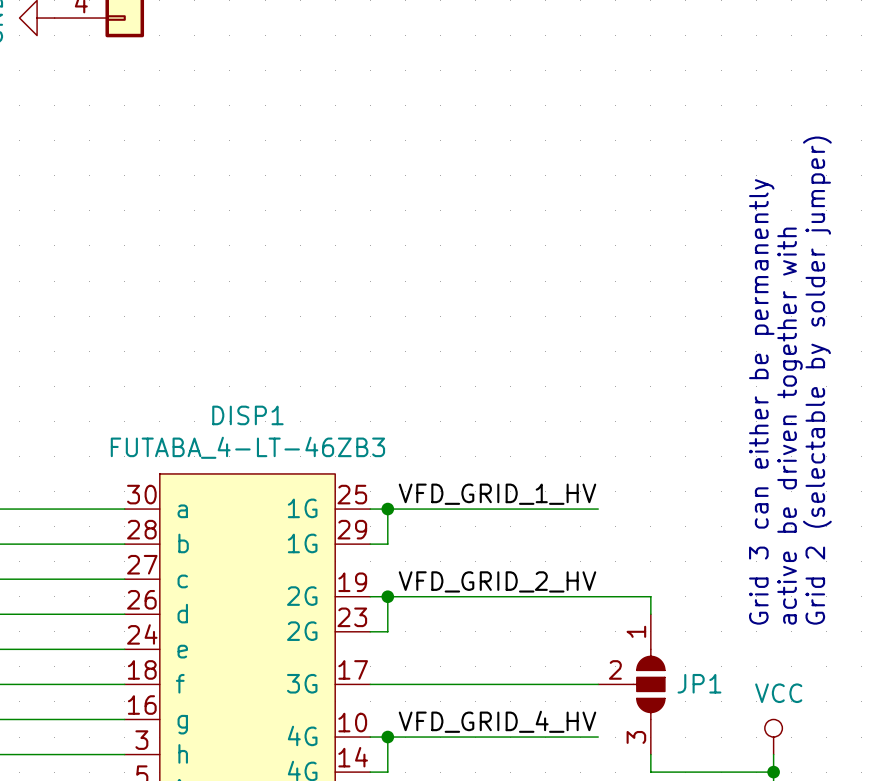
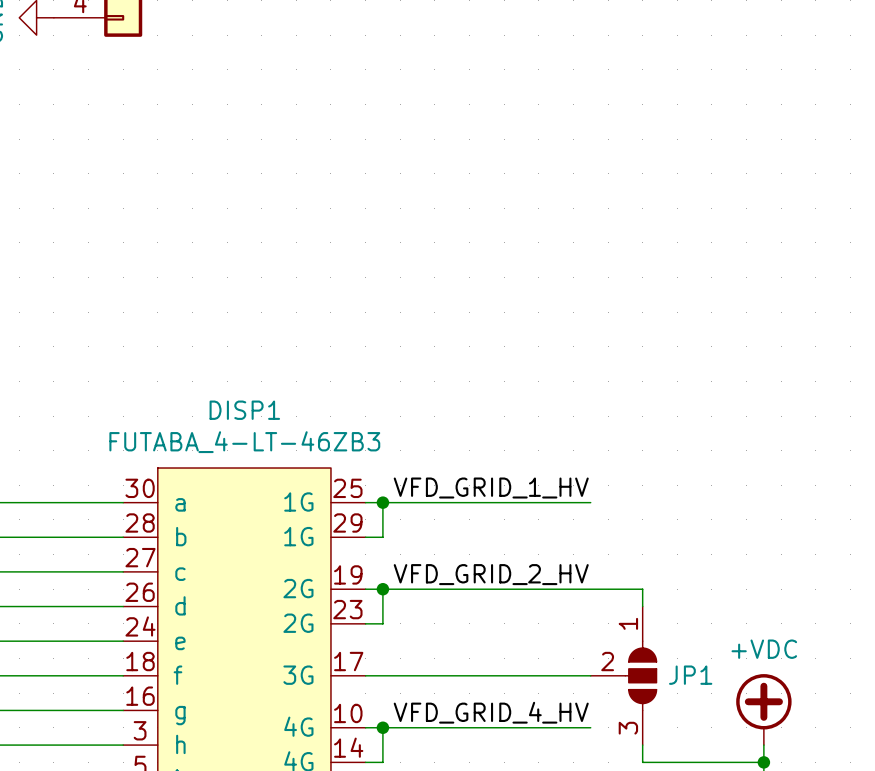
text: Grid 2 (selectable by solder jumper) (817, 380) -> none
text: Grid 3 can either be permanently (761, 401) -> none
text: active be driven together with (789, 426) -> none
power symbol: none -> +VDC (763, 709)
power symbol: VCC (773, 737) -> none

